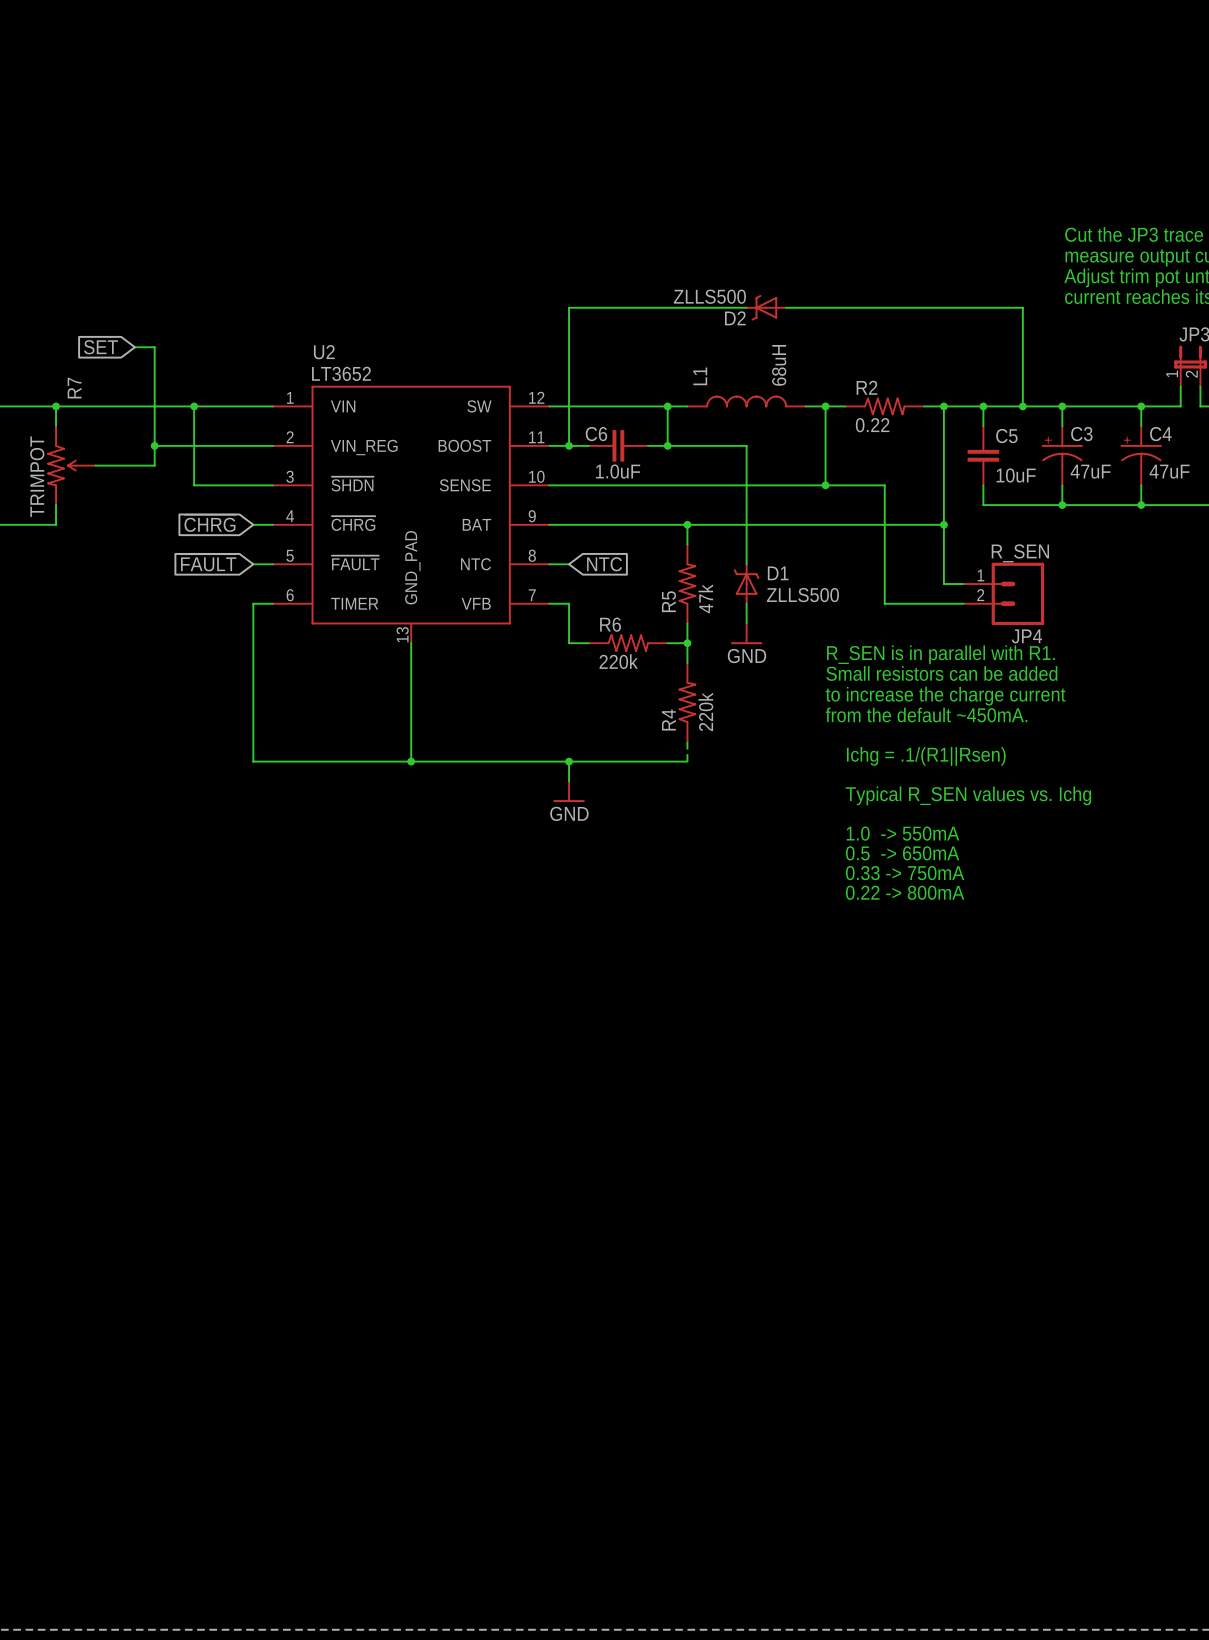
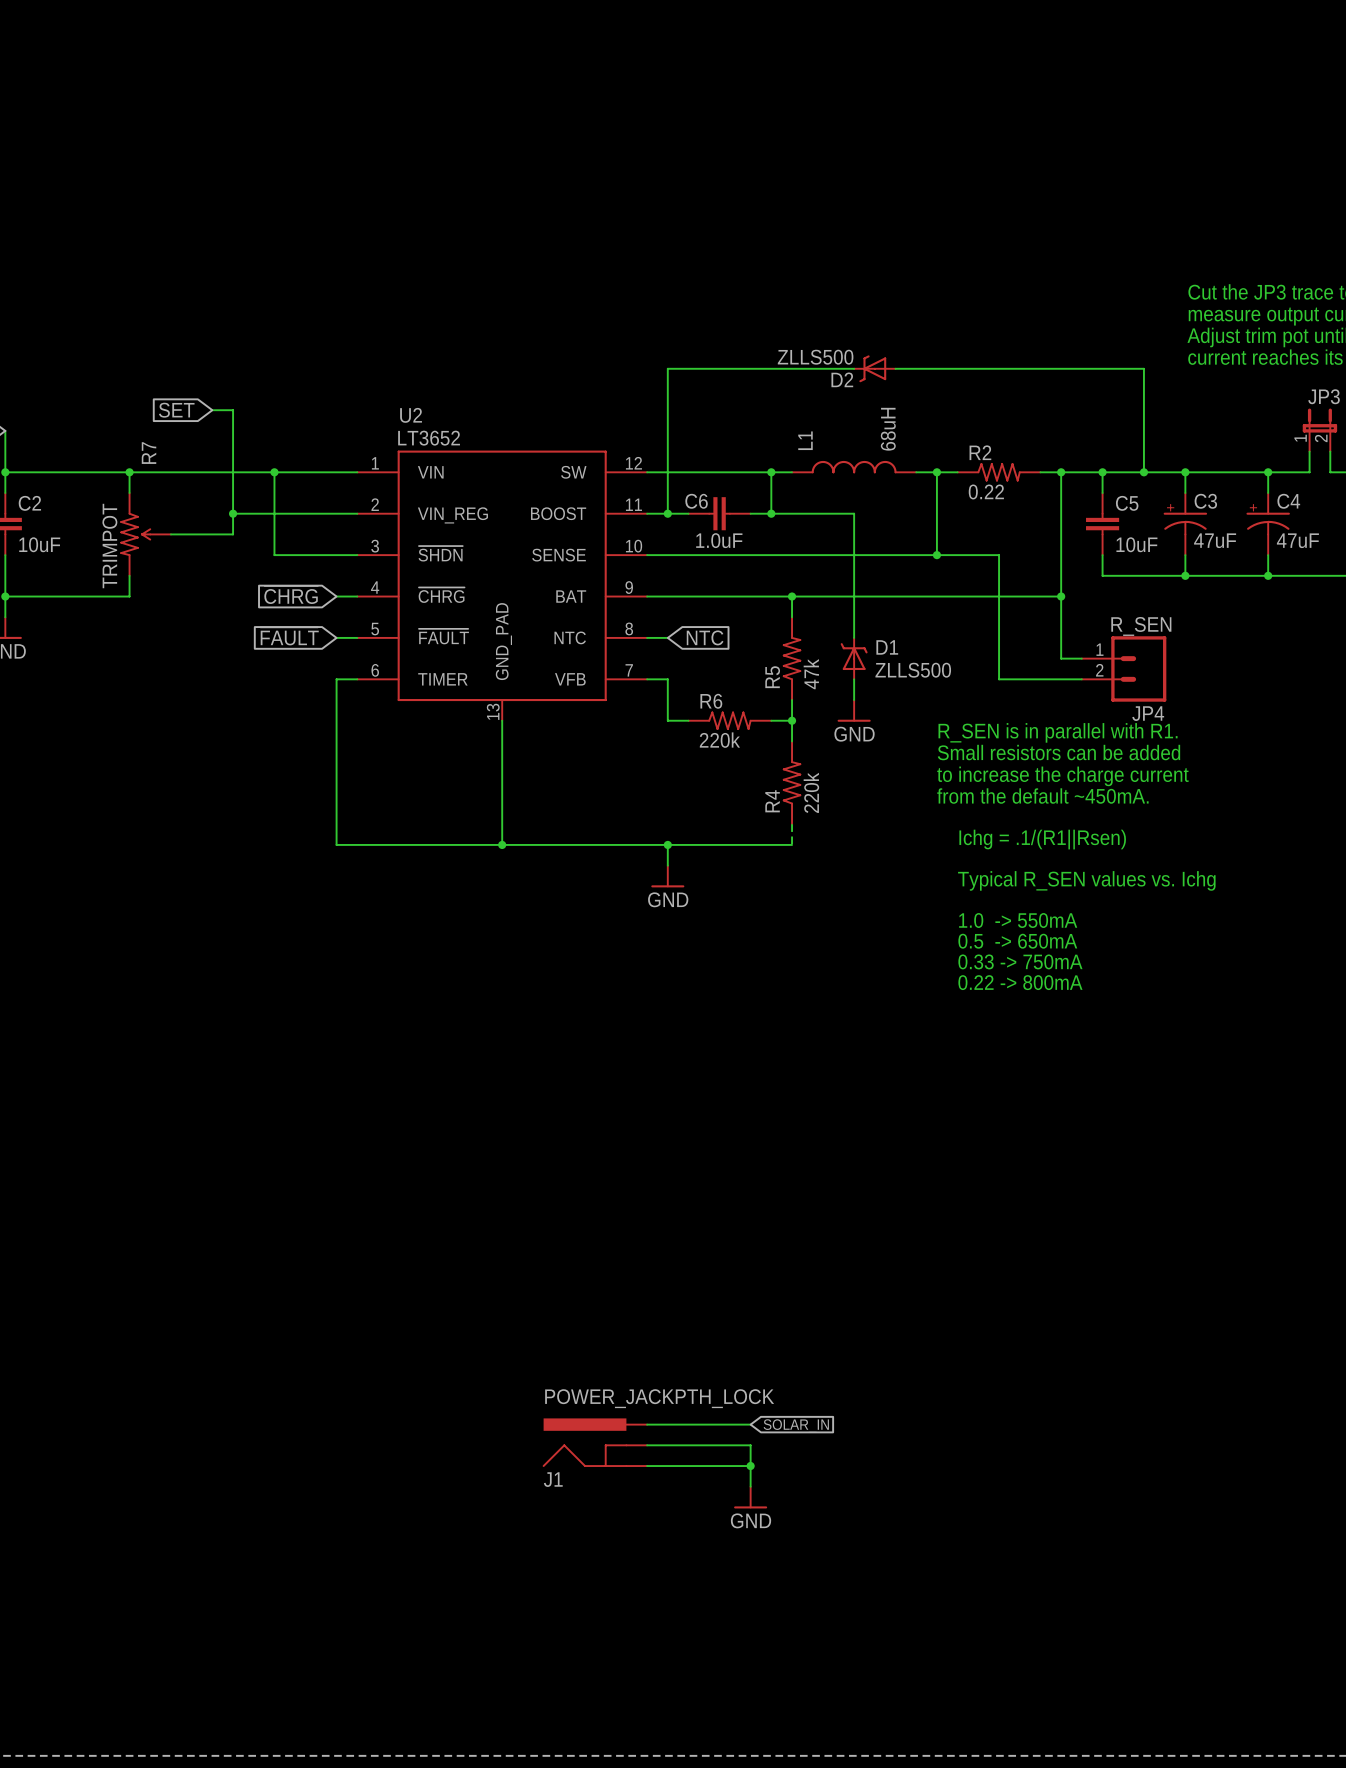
wire: none -> (647, 1424) (750, 1424)
global label: none -> SOLAR_IN (796, 1426)
J1: none -> POWER_JACKPTH_LOCK (595, 1442)
wire: none -> (647, 1445) (750, 1445) (750, 1486)
wire: none -> (647, 1466) (750, 1466)
junction: none -> (750, 1466)
power symbol: none -> GND (750, 1497)

